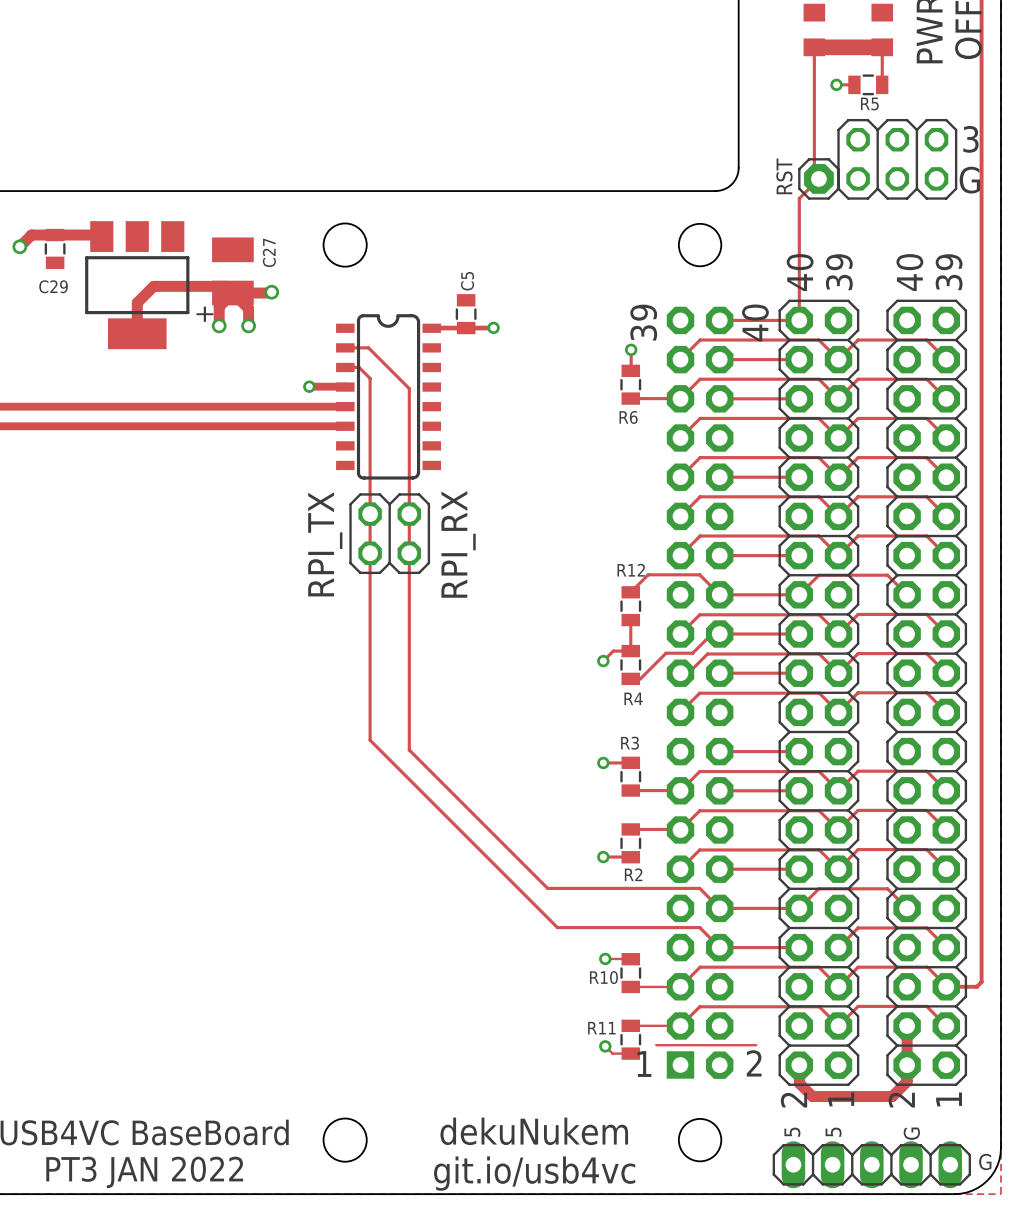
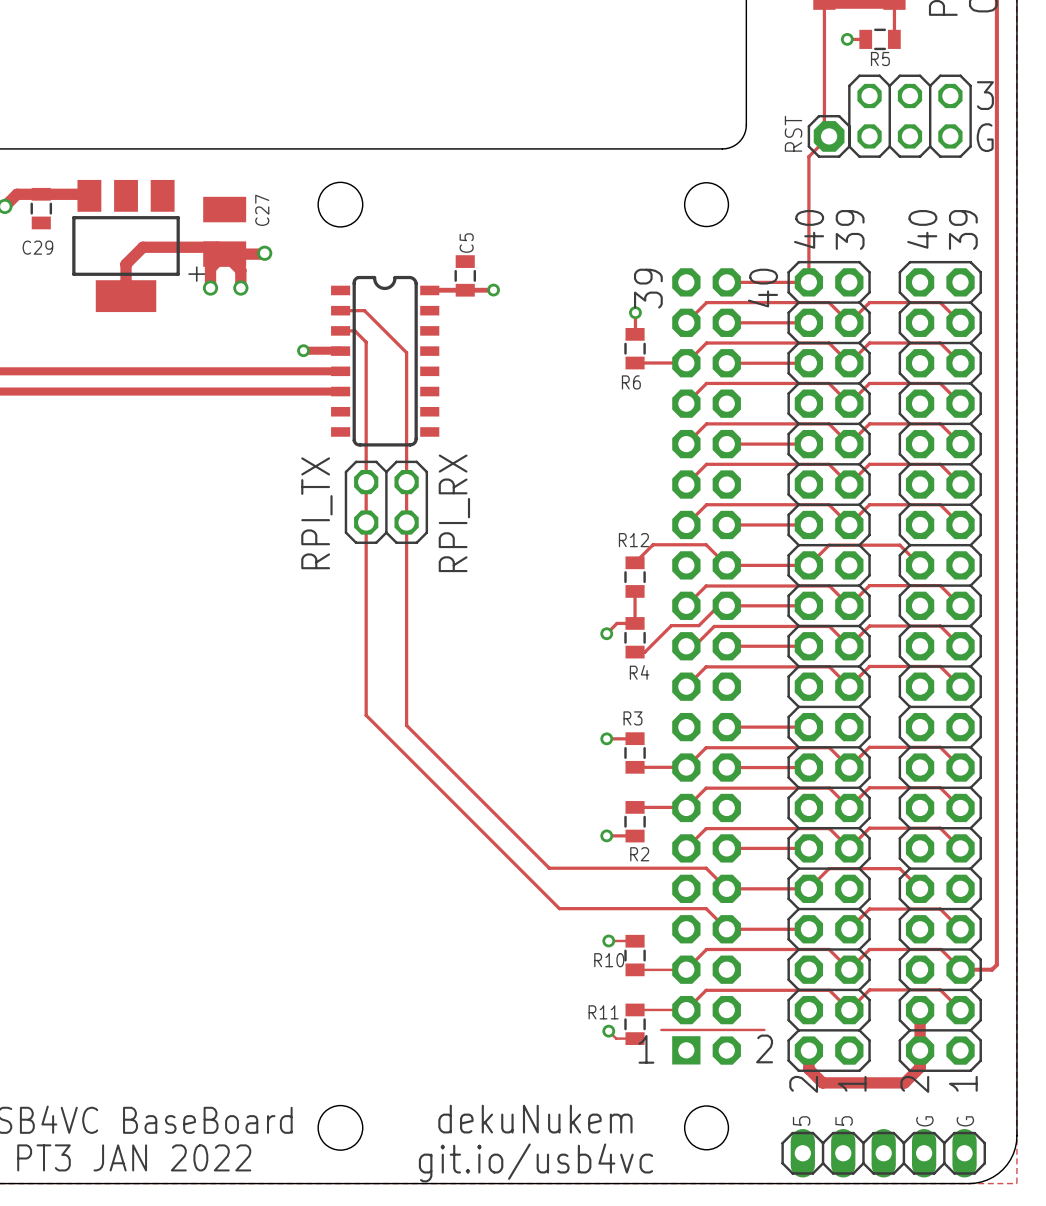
text rotation: 0° (985, 1162) -> 90° counterclockwise (965, 1121)
text position: G (985, 1162) -> G (965, 1121)

